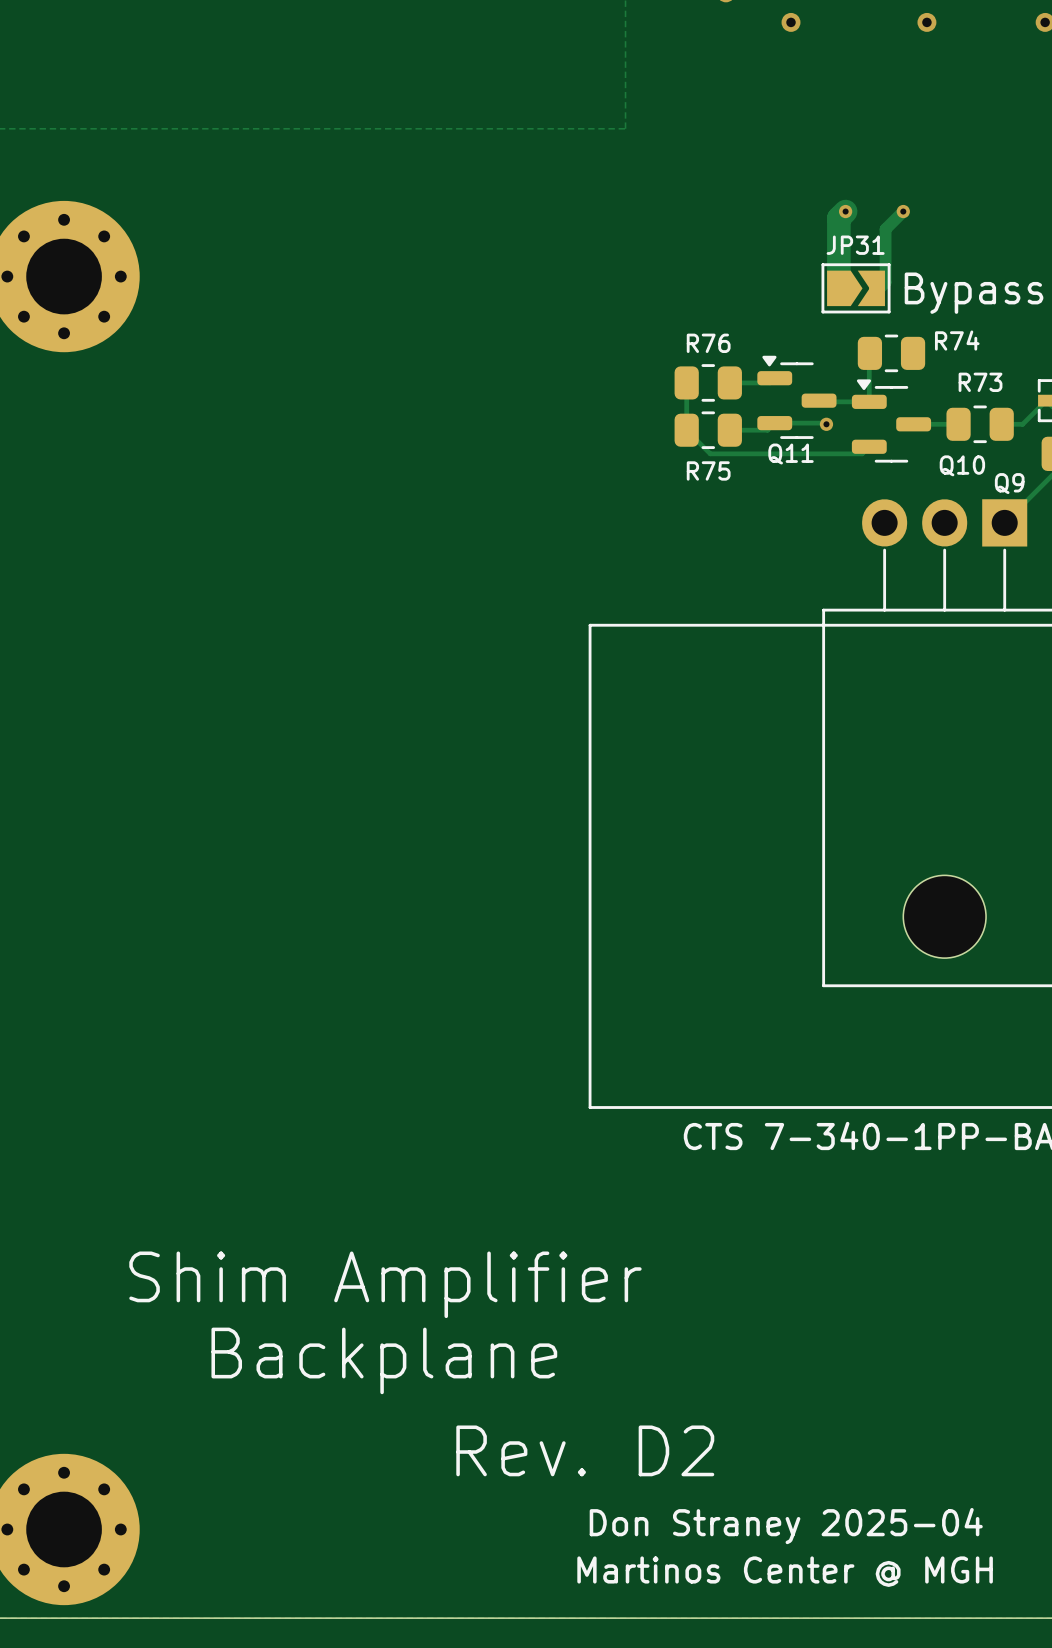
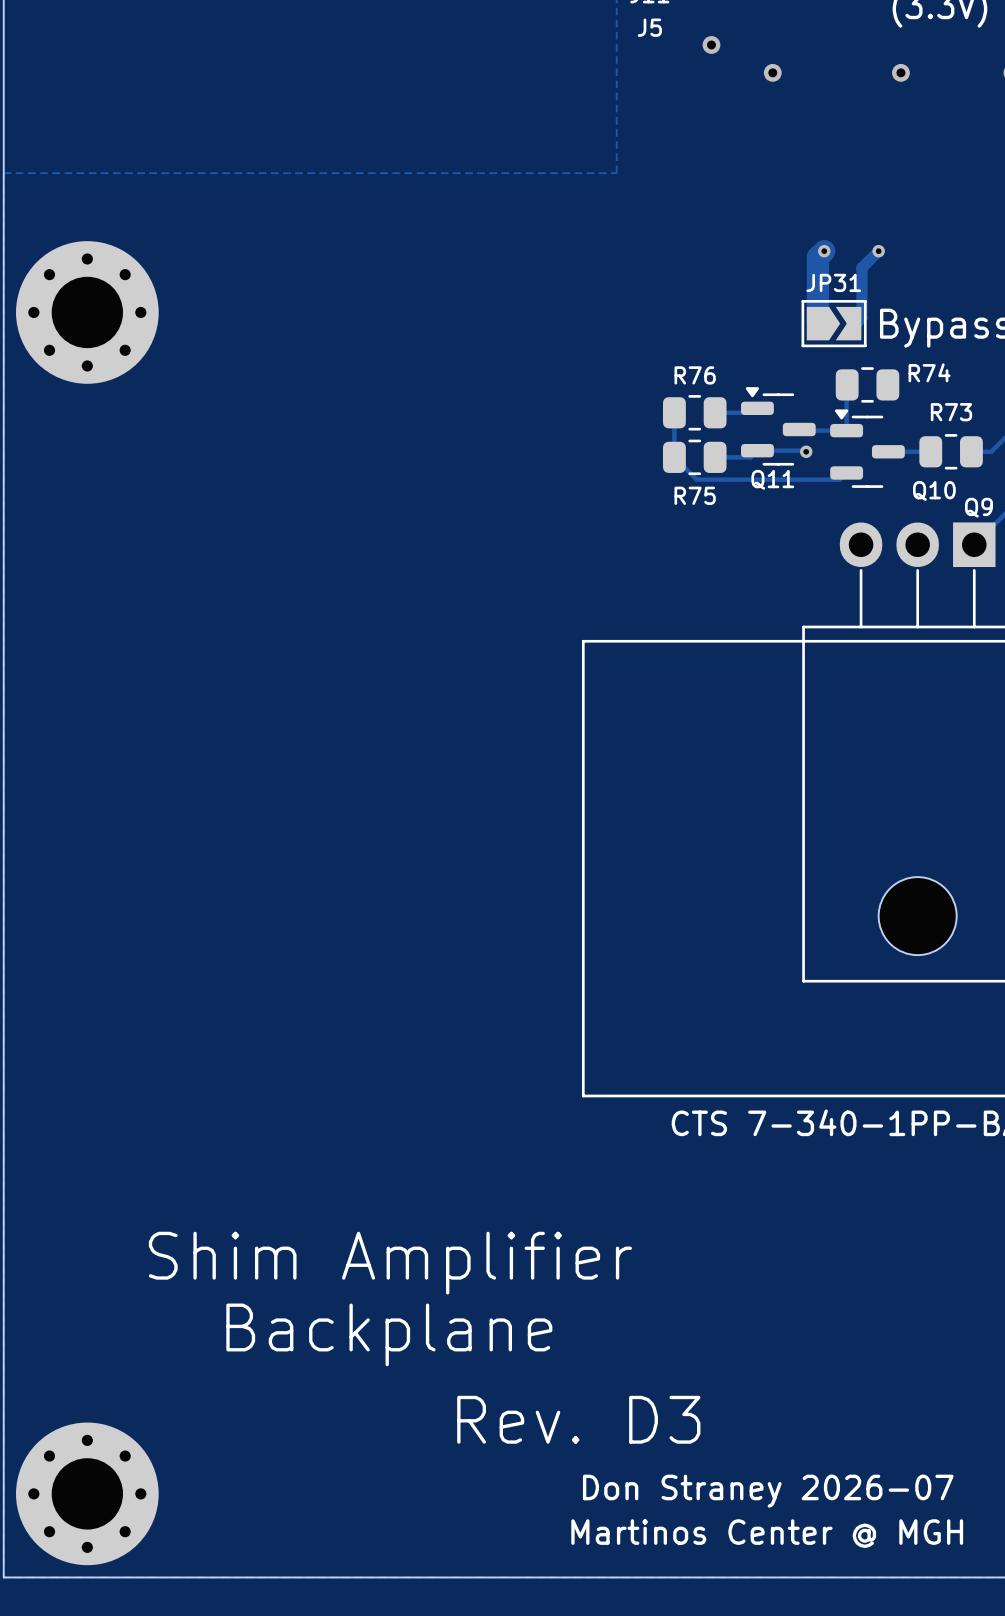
text: Rev. D2 (585, 1450) -> Rev. D3 (578, 1419)
text: Don Straney 2025-04 (786, 1526) -> Don Straney 2026-07 (768, 1491)

